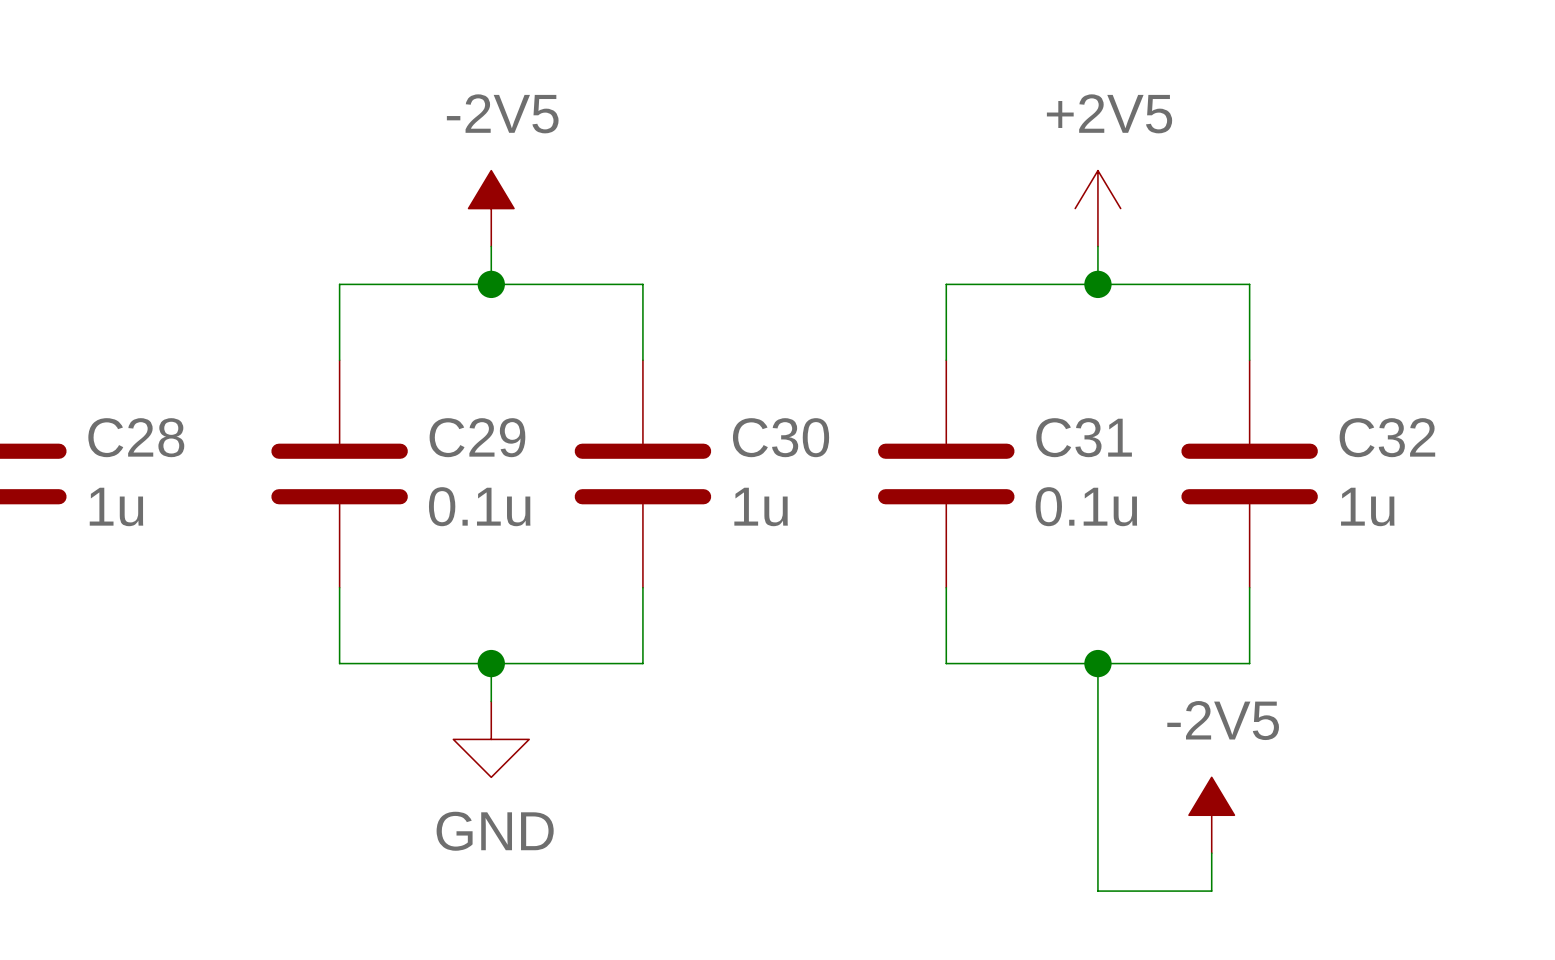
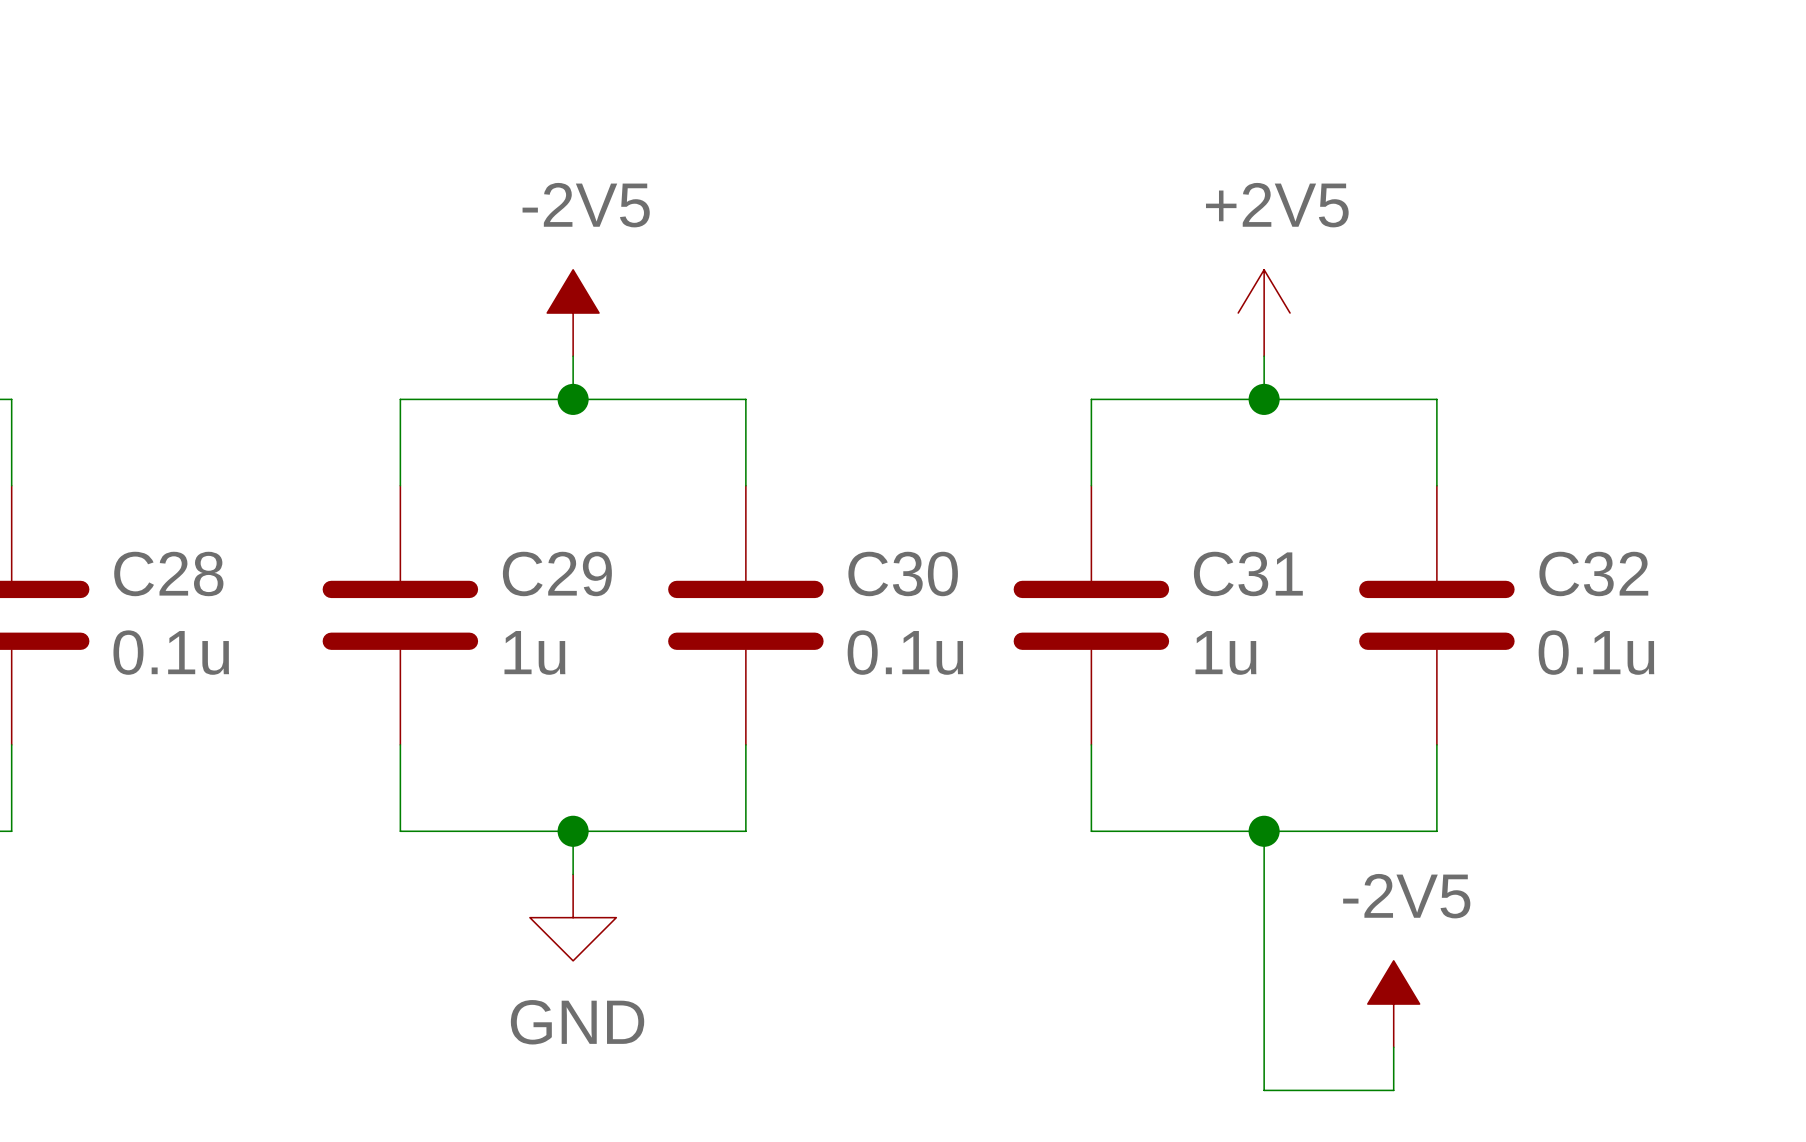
C28 value: 1u (116, 506) -> 0.1u (171, 652)
C29 value: 0.1u (479, 506) -> 1u (534, 652)
C30 value: 1u (761, 506) -> 0.1u (905, 652)
C31 value: 0.1u (1086, 506) -> 1u (1225, 652)
C32 value: 1u (1367, 506) -> 0.1u (1596, 652)

